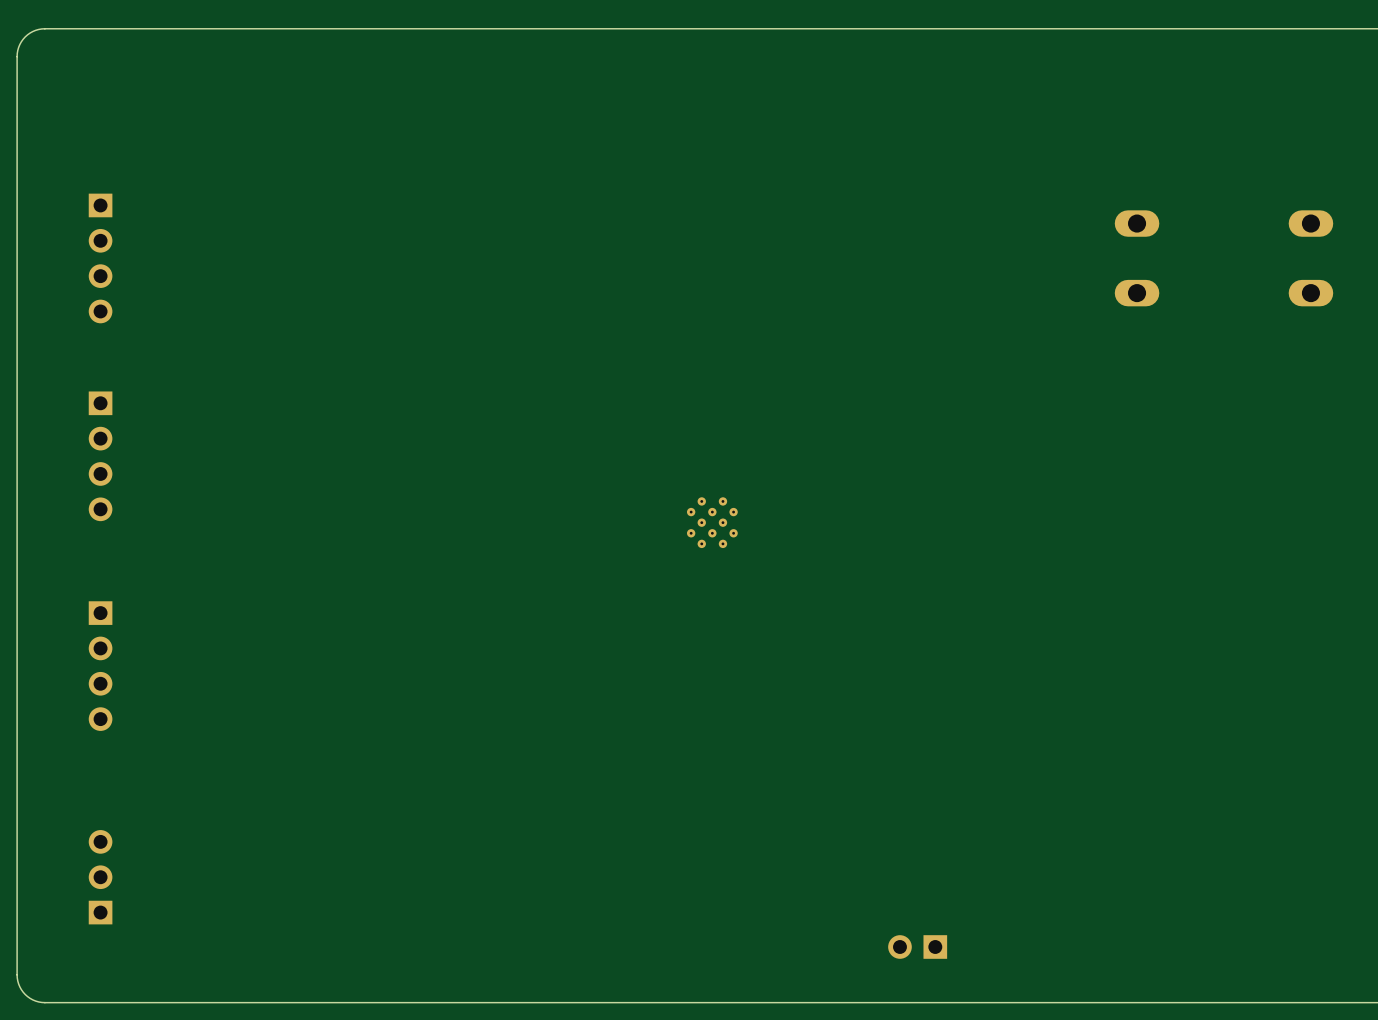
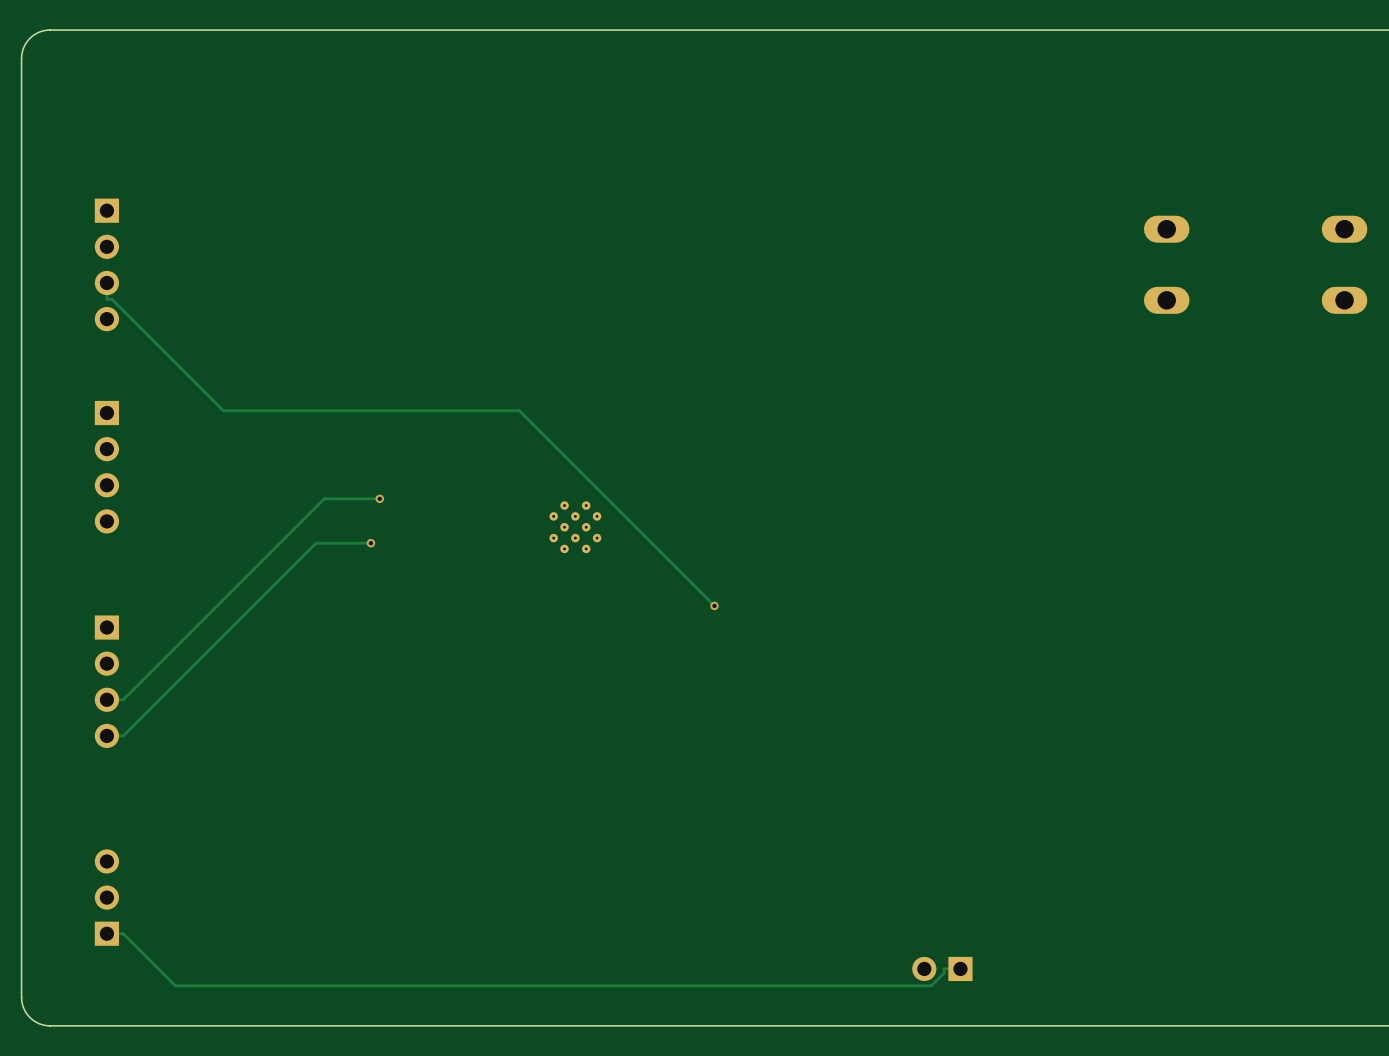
track: none -> (106, 282) (106, 299) (111, 299) (223, 410) (519, 410) (714, 605)
track: none -> (379, 498) (324, 498) (123, 699) (106, 699)
via: none -> (379, 498)
part position: (712, 522) -> (575, 527)
track: none -> (370, 543) (316, 543) (123, 735) (106, 735)
via: none -> (370, 543)
via: none -> (714, 605)
track: none -> (106, 933) (123, 933) (175, 985) (931, 985) (944, 973) (944, 968) (960, 968)

